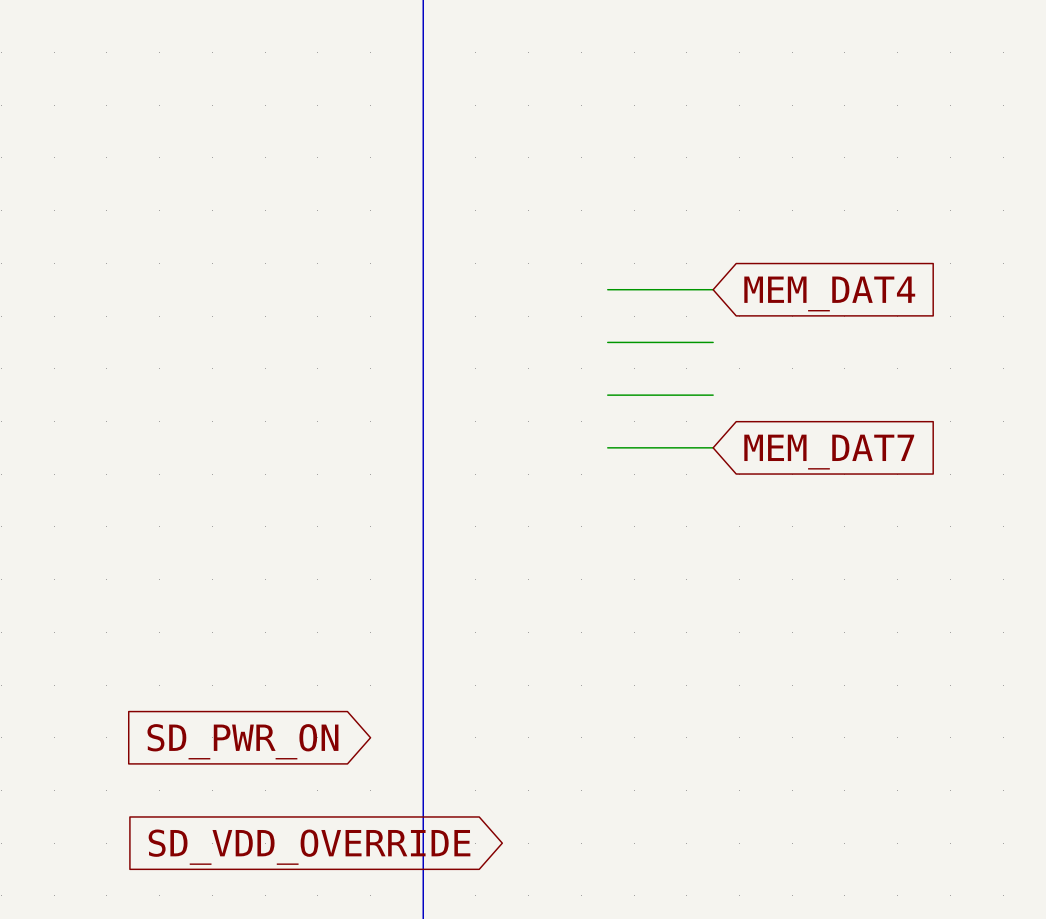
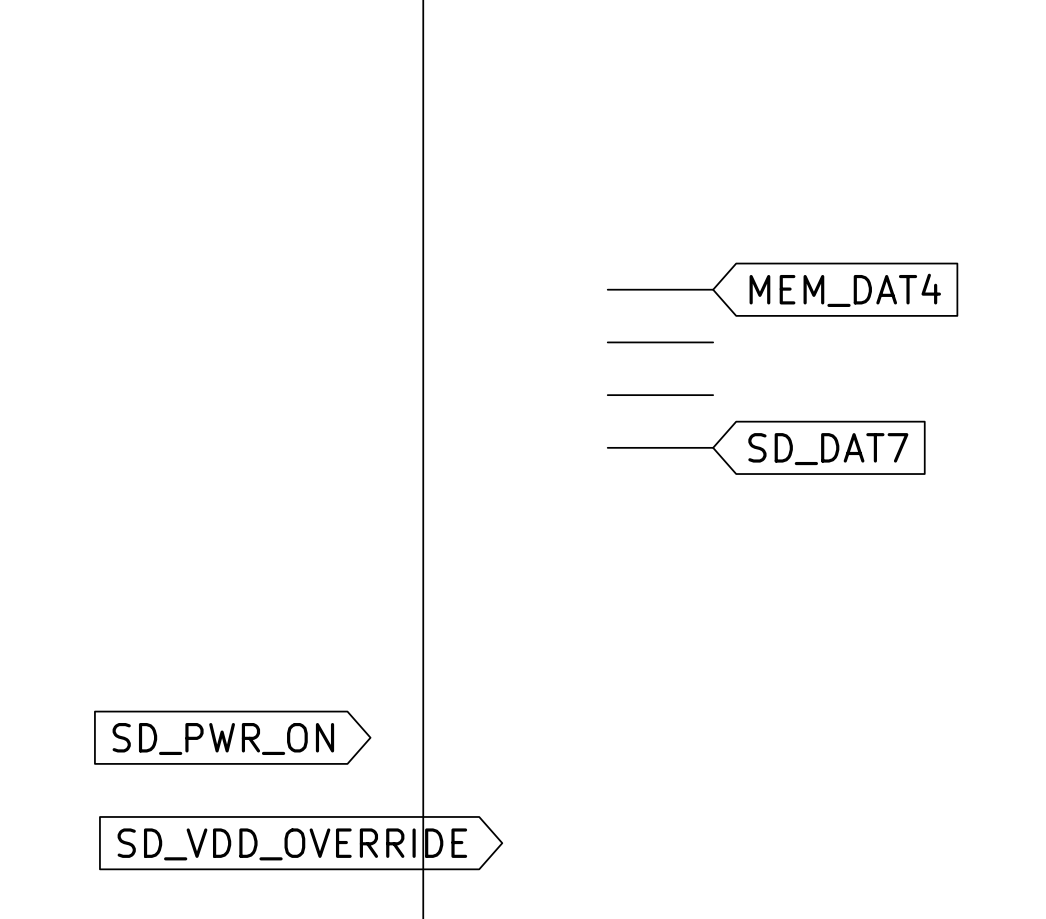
global label: MEM_DAT7 (829, 452) -> SD_DAT7 (828, 449)

